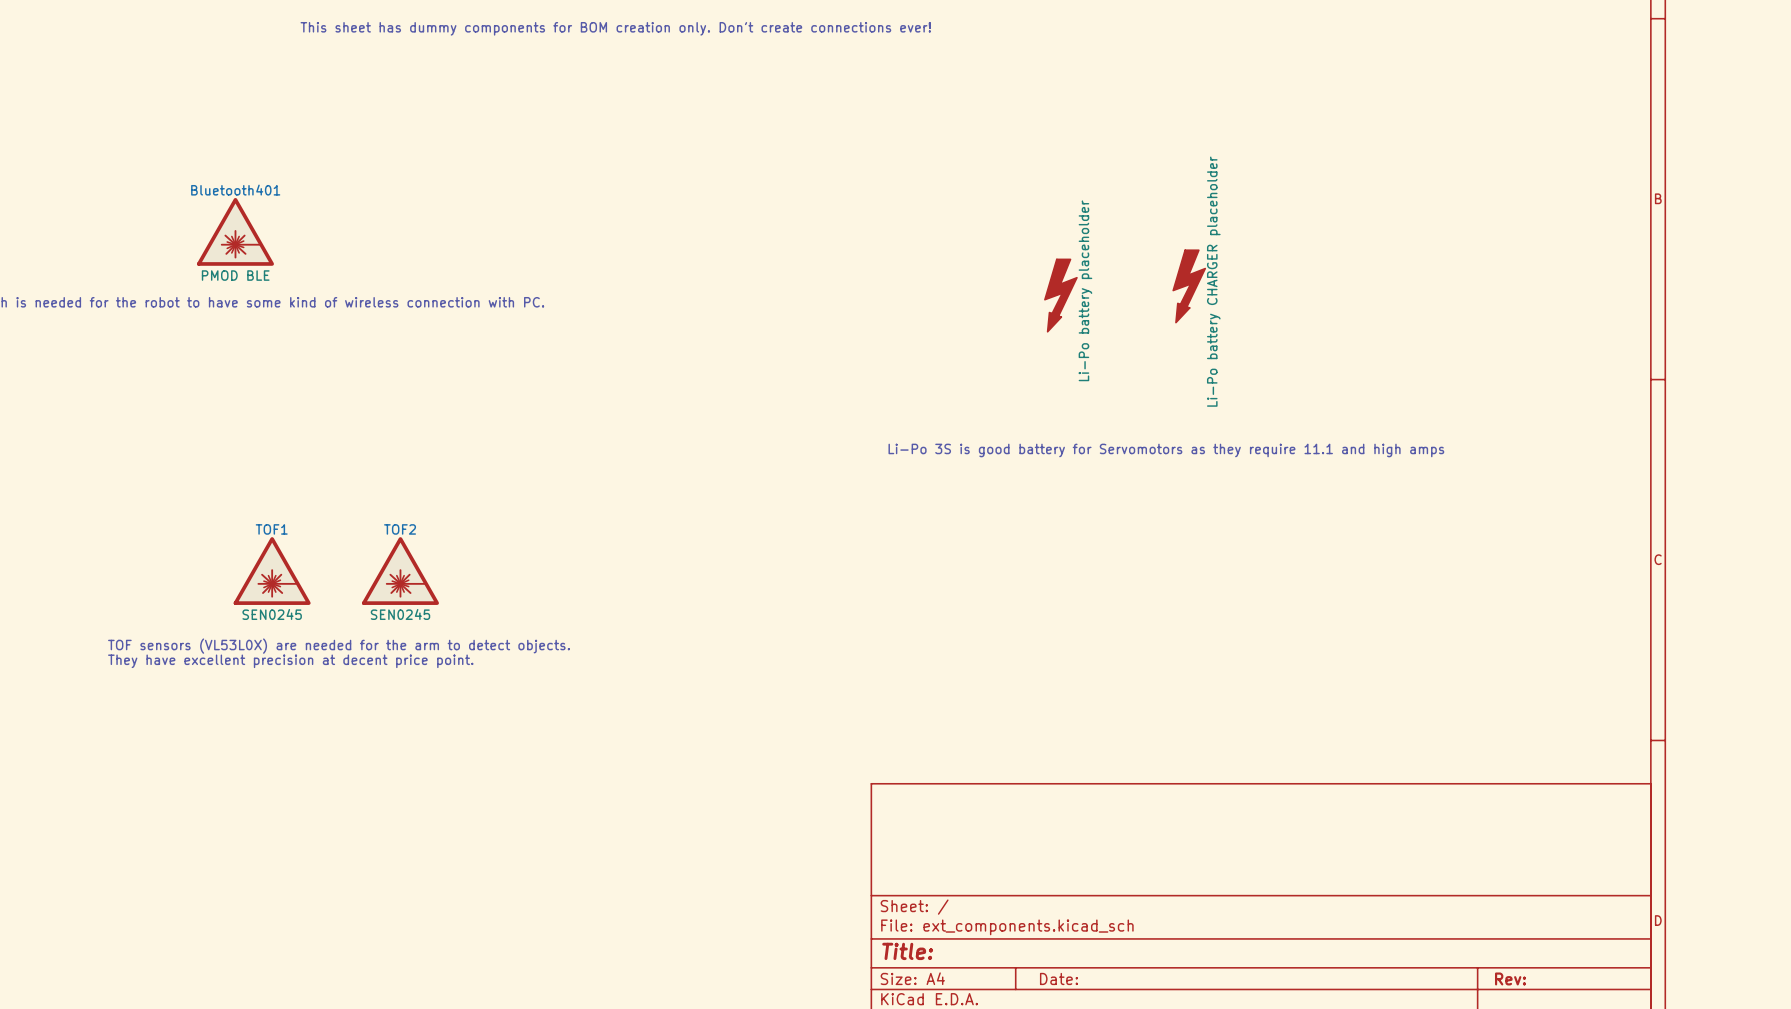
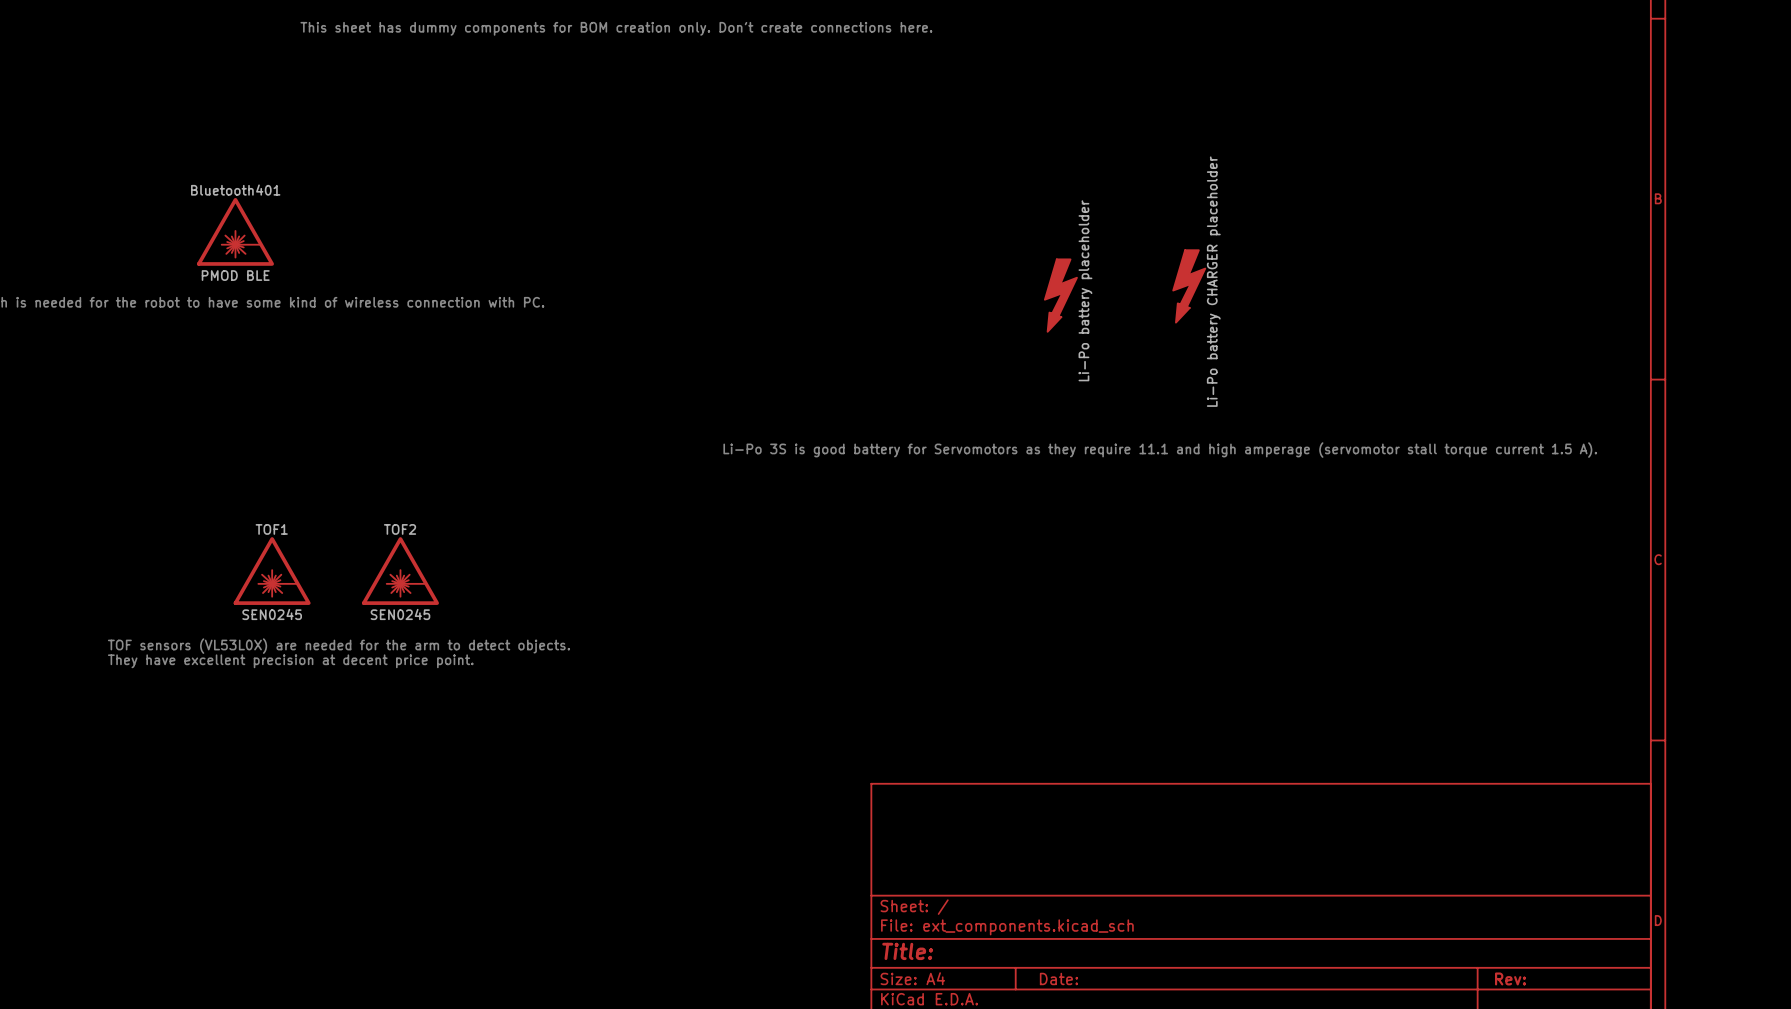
text: This sheet has dummy components for BOM creation only. Don't create connections ever! (615, 28) -> This sheet has dummy components for BOM creation only. Don't create connections here. (616, 28)
text: Li-Po 3S is good battery for Servomotors as they require 11.1 and high amps (1166, 450) -> Li-Po 3S is good battery for Servomotors as they require 11.1 and high amperage (servomotor stall torque current 1.5 A). (1160, 450)

